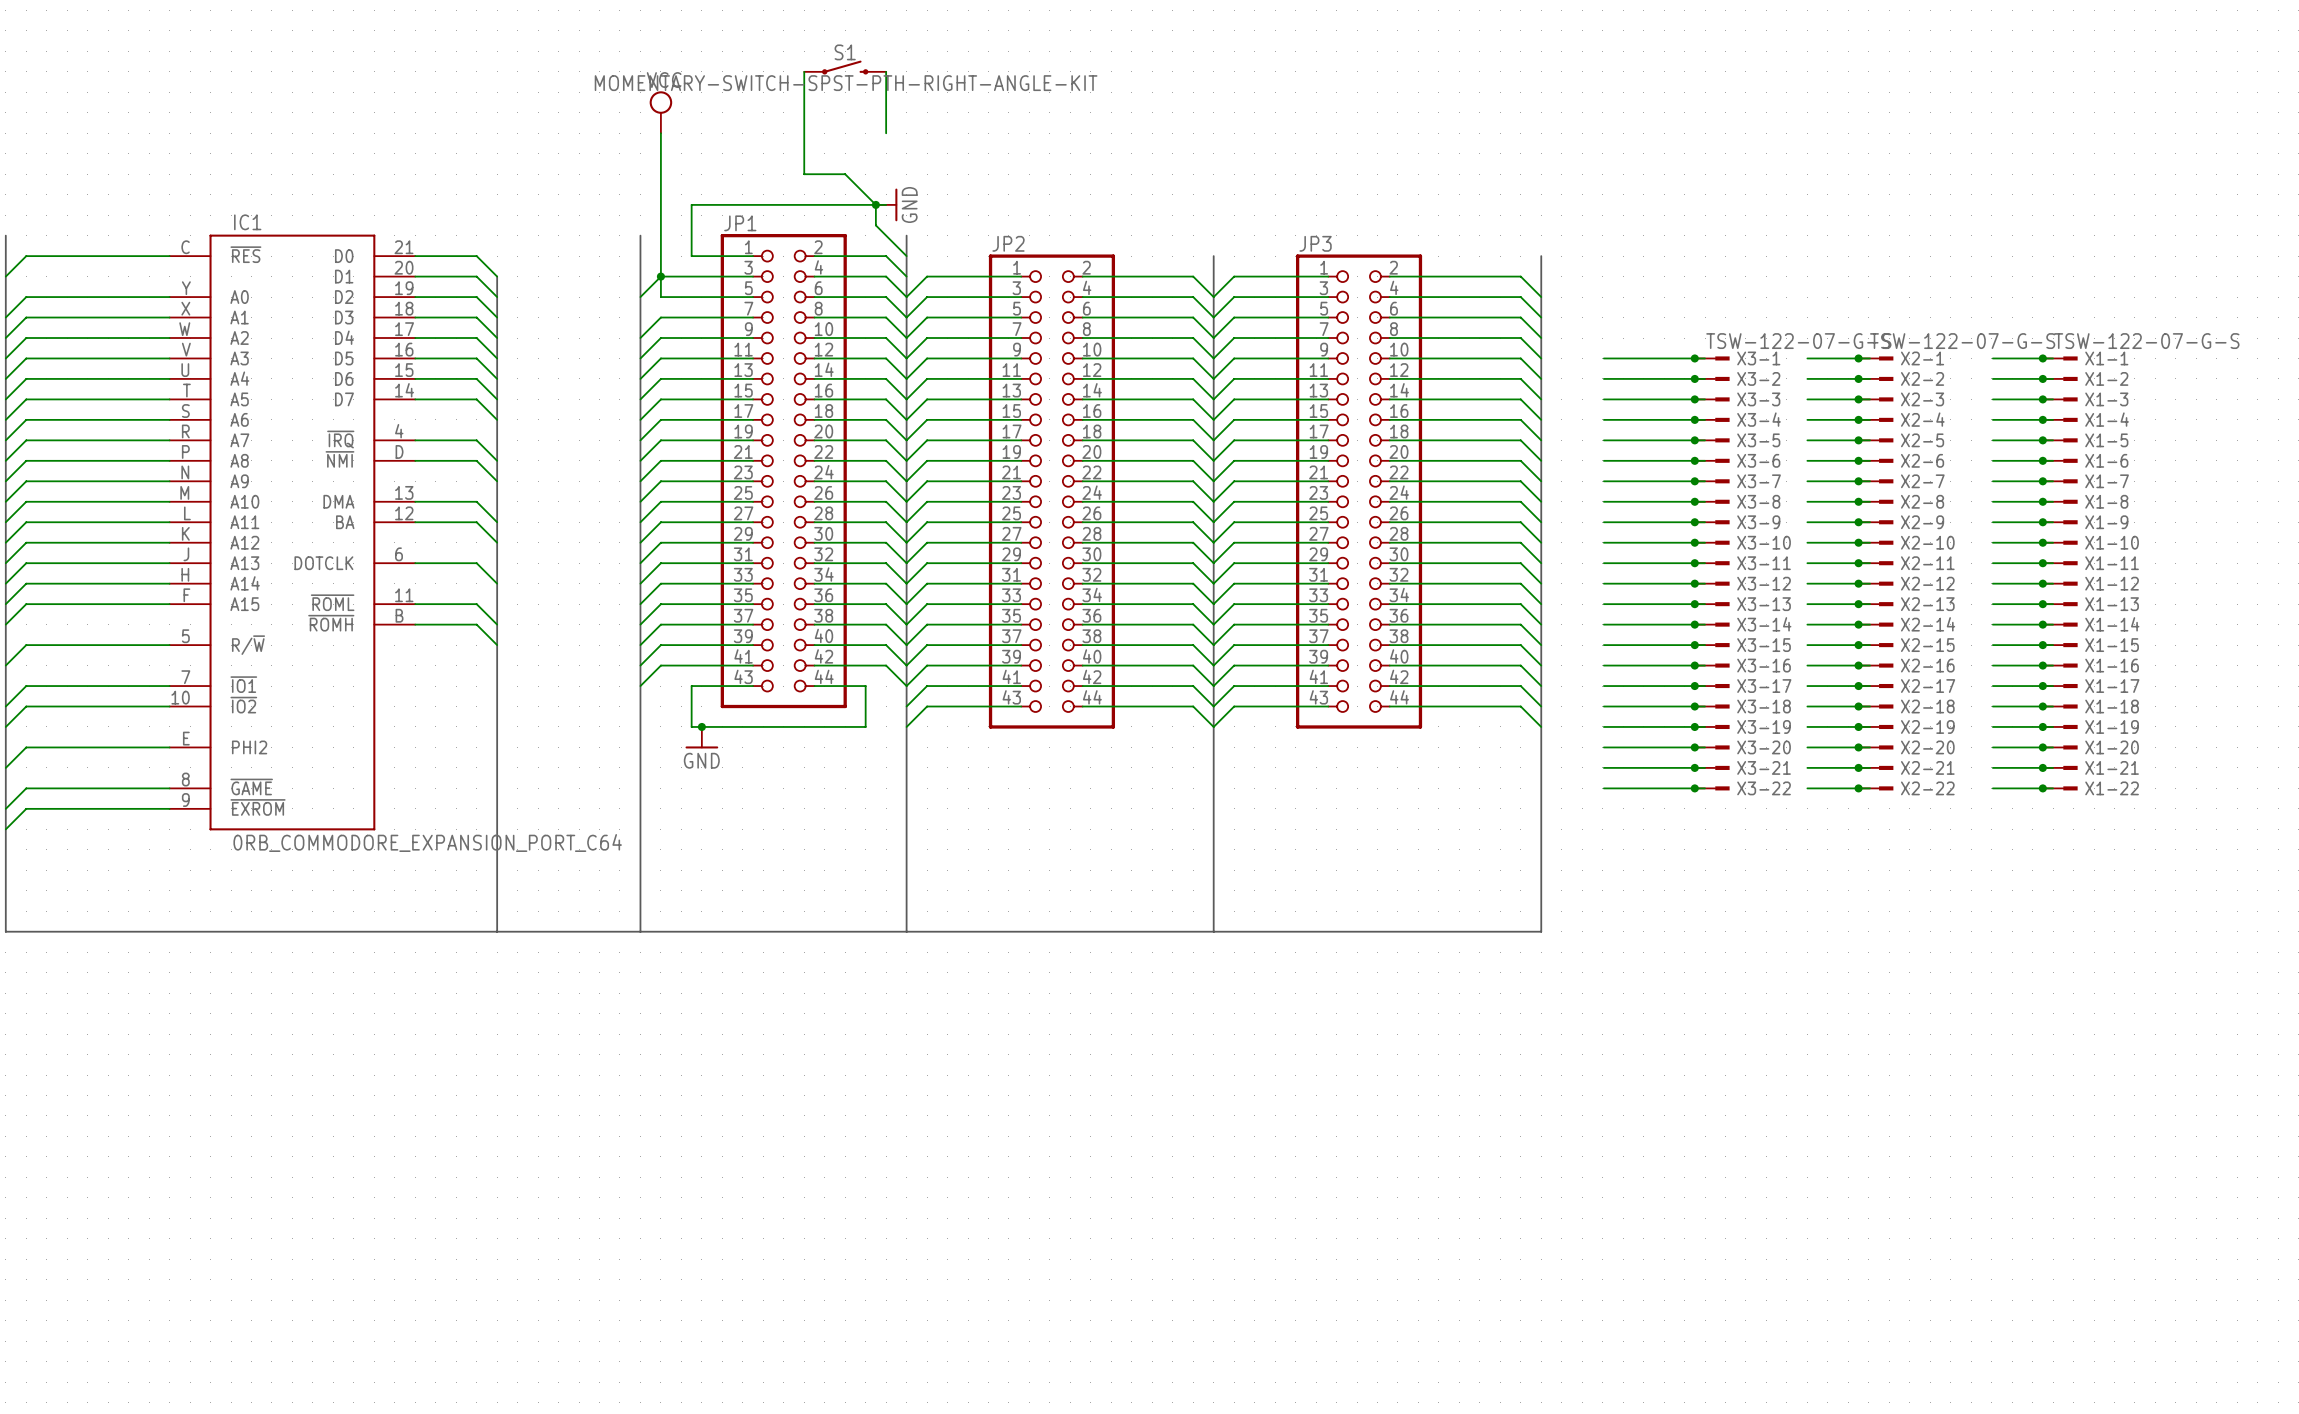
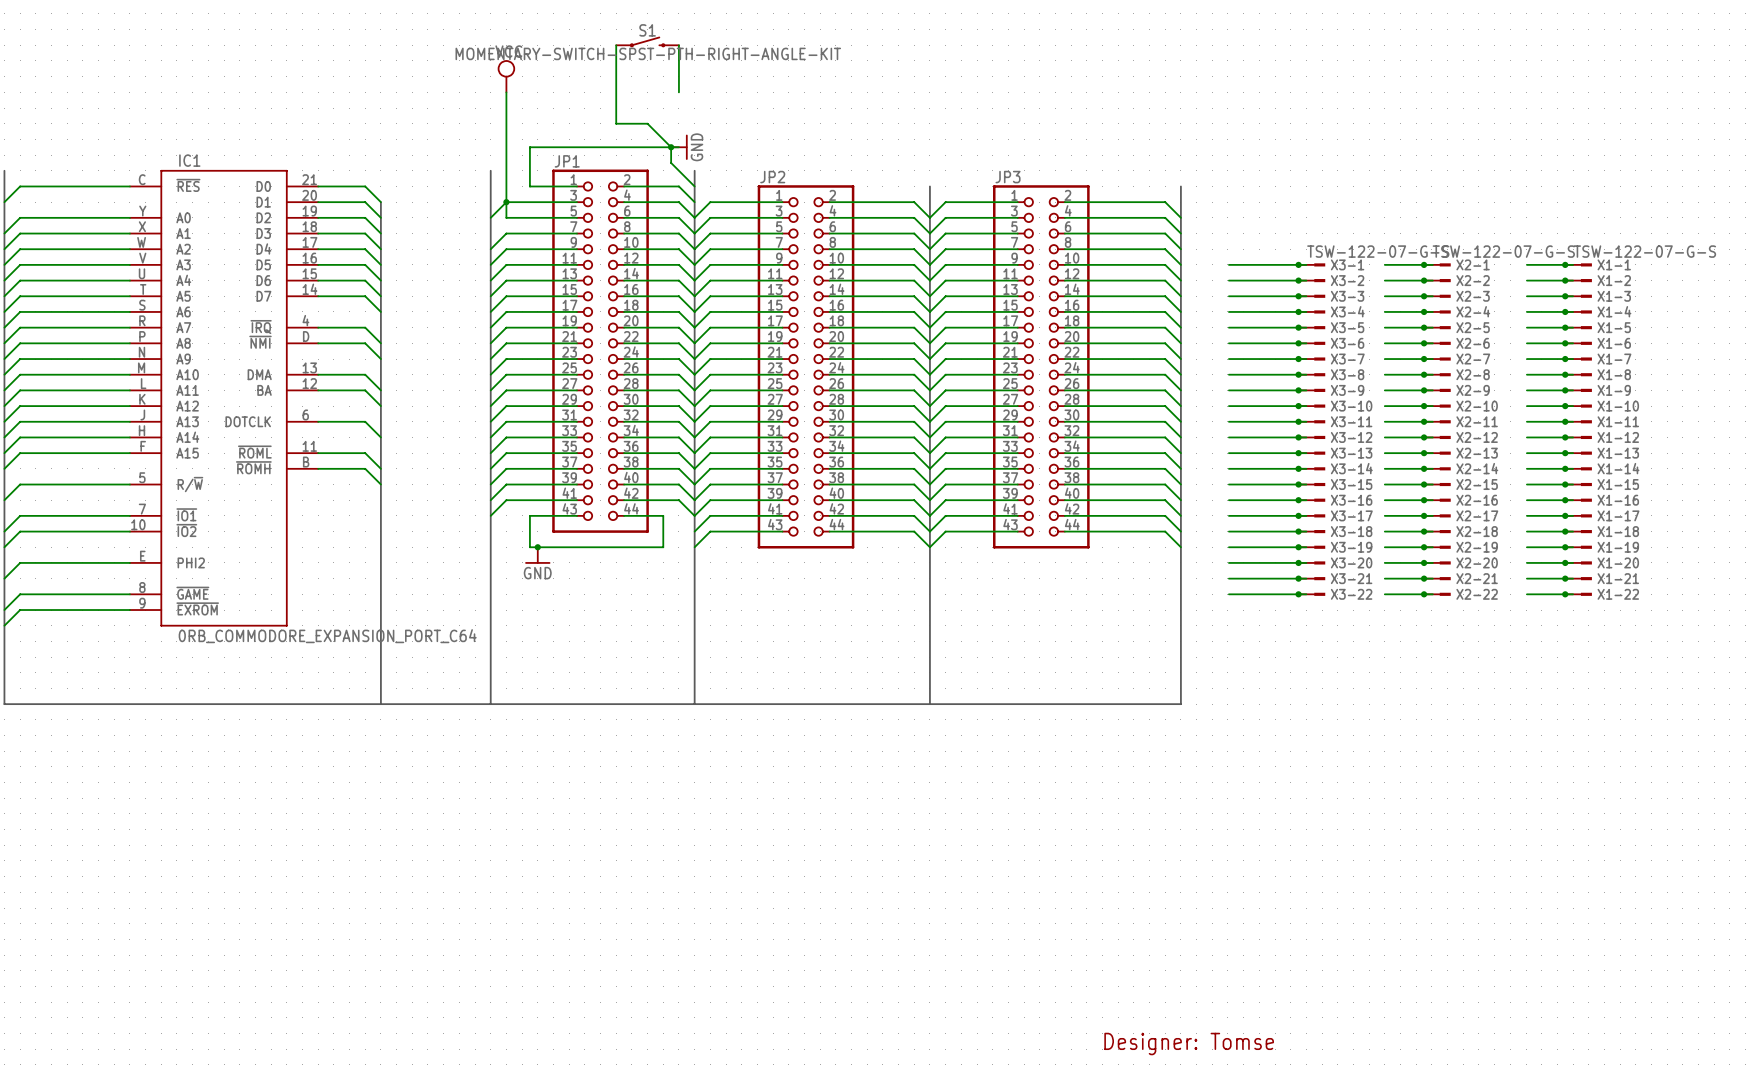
text: none -> Designer: Tomse (1189, 1044)

